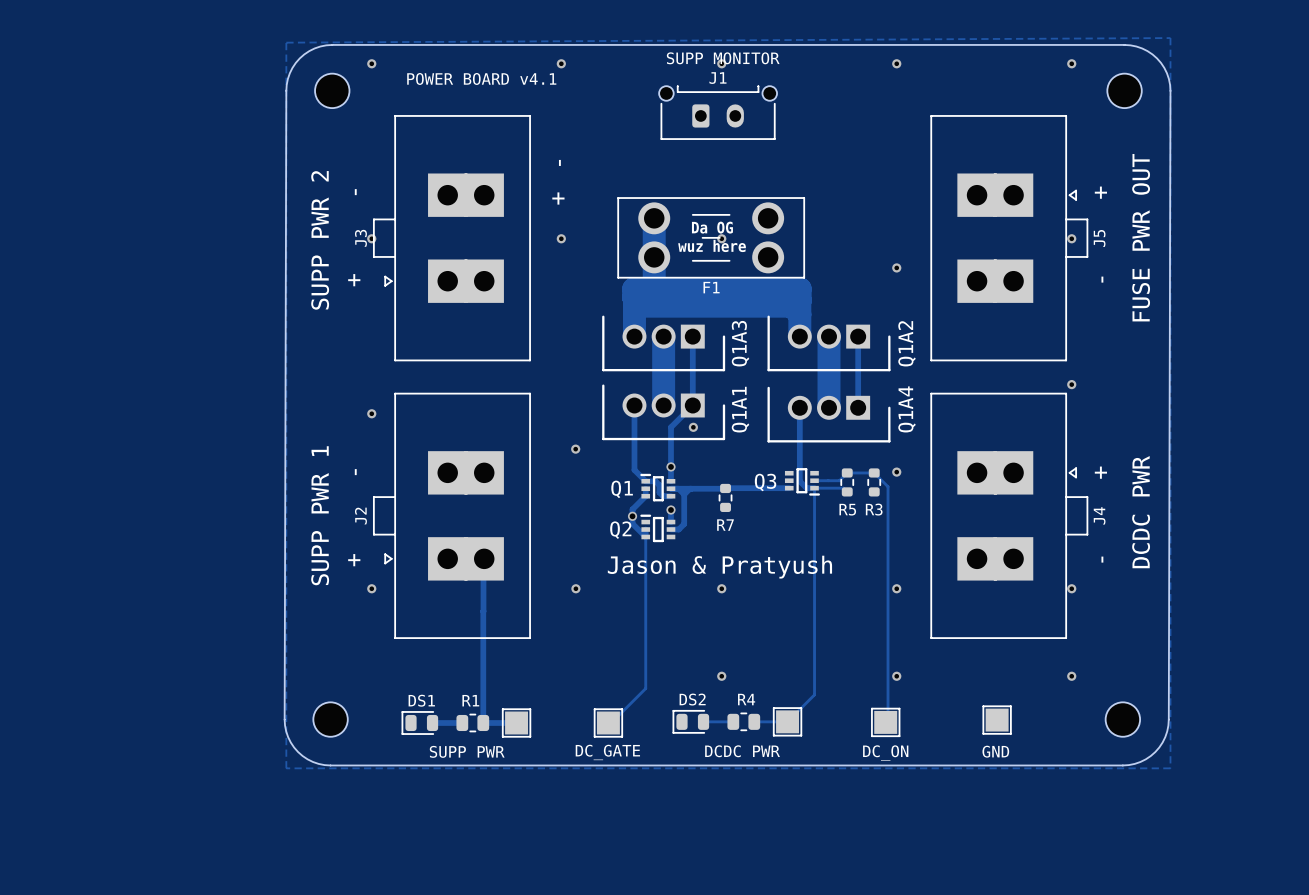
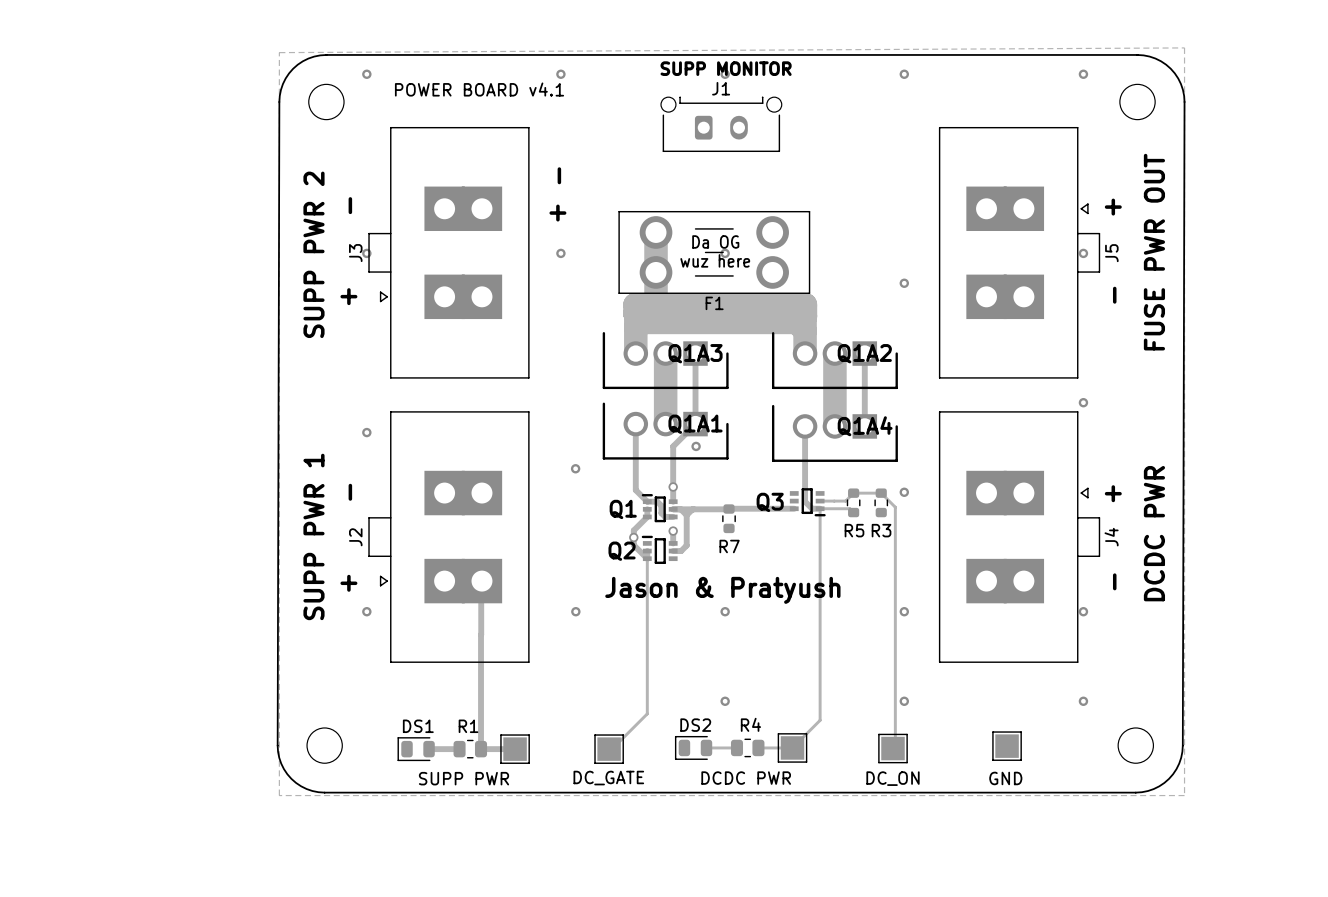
Q1A3 name rotation: 0° (740, 343) -> 90° clockwise (695, 353)
Q1A2 name rotation: 0° (907, 343) -> 90° clockwise (864, 353)
Q1A1 name rotation: 0° (740, 409) -> 90° clockwise (695, 424)
Q1A4 name rotation: 0° (907, 409) -> 90° clockwise (865, 426)

